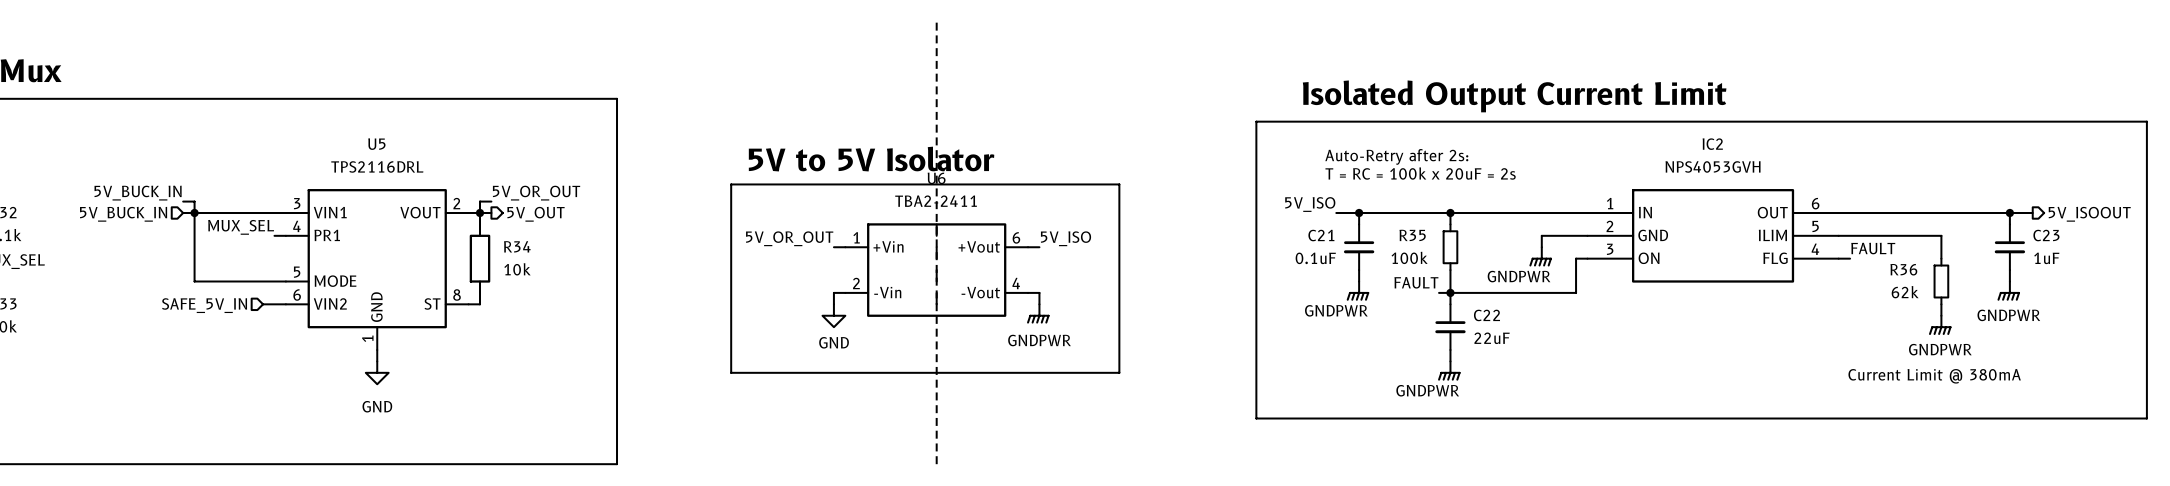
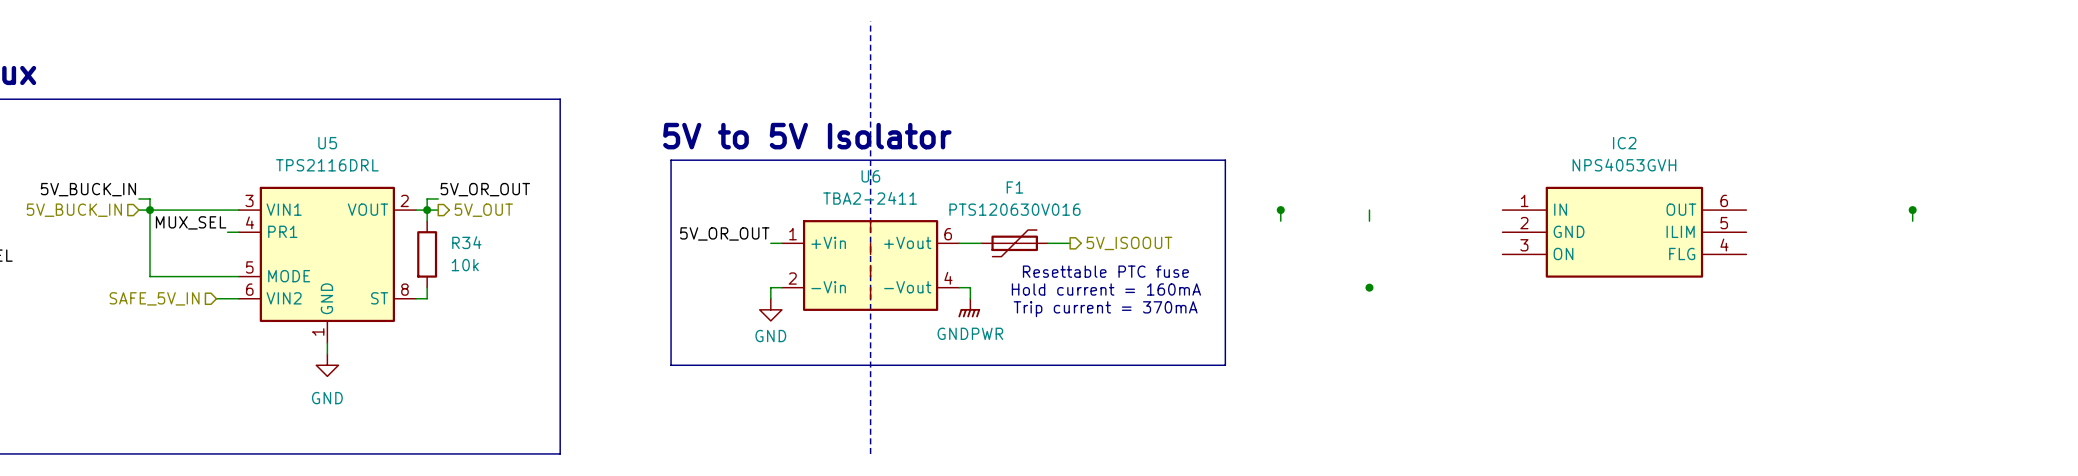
text: Isolated Output Current Limit (1514, 96) -> none
line: (1256, 121) (2146, 121) (2146, 418) (1256, 418) (1256, 121) -> none
text: Auto-Retry after 2s: (1396, 156) -> none
text position: 5V to 5V Isolator (871, 159) -> 5V to 5V Isolator (807, 136)
text: T = RC = 100k x 20uF = 2s (1420, 173) -> none
line: (731, 184) (1119, 184) (1119, 372) -> (671, 182) (671, 160) (1225, 160) (1225, 365) (1047, 365)
label: 5V_ISO (1310, 204) -> none
wire: (1336, 212) (1587, 212) -> none
junction: (1450, 212) -> none
wire: (1838, 212) (2032, 212) -> none
hierarchical label: 5V_ISOOUT (2089, 214) -> none
wire: (1587, 235) (1541, 235) (1541, 247) -> none
wire: (1838, 235) (1941, 235) (1941, 258) -> none
label: 5V_ISO (1066, 238) -> none
wire: none -> (970, 243) (981, 243)
F1: none -> PTS120630V016 (1014, 243)
wire: none -> (1047, 243) (1070, 243)
C21: 0.1uF (1359, 247) -> none
R35: 100k (1450, 247) -> none
C23: 1uF (2009, 247) -> none
hierarchical label: none -> 5V_ISOOUT (1129, 243)
label: FAULT (1873, 248) -> none
power symbol: GNDPWR (1540, 256) -> none
wire: (1587, 258) (1576, 258) (1576, 292) (1439, 292) -> none
wire: (1838, 258) (1850, 258) -> none
wire: (1359, 270) (1359, 281) -> none
wire: (1450, 270) (1450, 304) -> none
wire: (2009, 270) (2009, 281) -> none
text: none -> Resettable PTC fuse (1105, 271)
R36: 62k (1941, 281) -> none
label: FAULT (1416, 282) -> none
power symbol: GNDPWR (1357, 291) -> none
power symbol: GNDPWR (2008, 291) -> none
text: none -> Hold current = 160mA (1106, 289)
wire: (1941, 304) (1941, 315) -> none
text: none -> Trip current = 370mA (1105, 309)
power symbol: GNDPWR (1940, 325) -> none
C22: 22uF (1450, 327) -> none
wire: (1450, 350) (1450, 361) -> none
power symbol: GNDPWR (1449, 371) -> none
text: Current Limit @ 380mA (1934, 376) -> none

